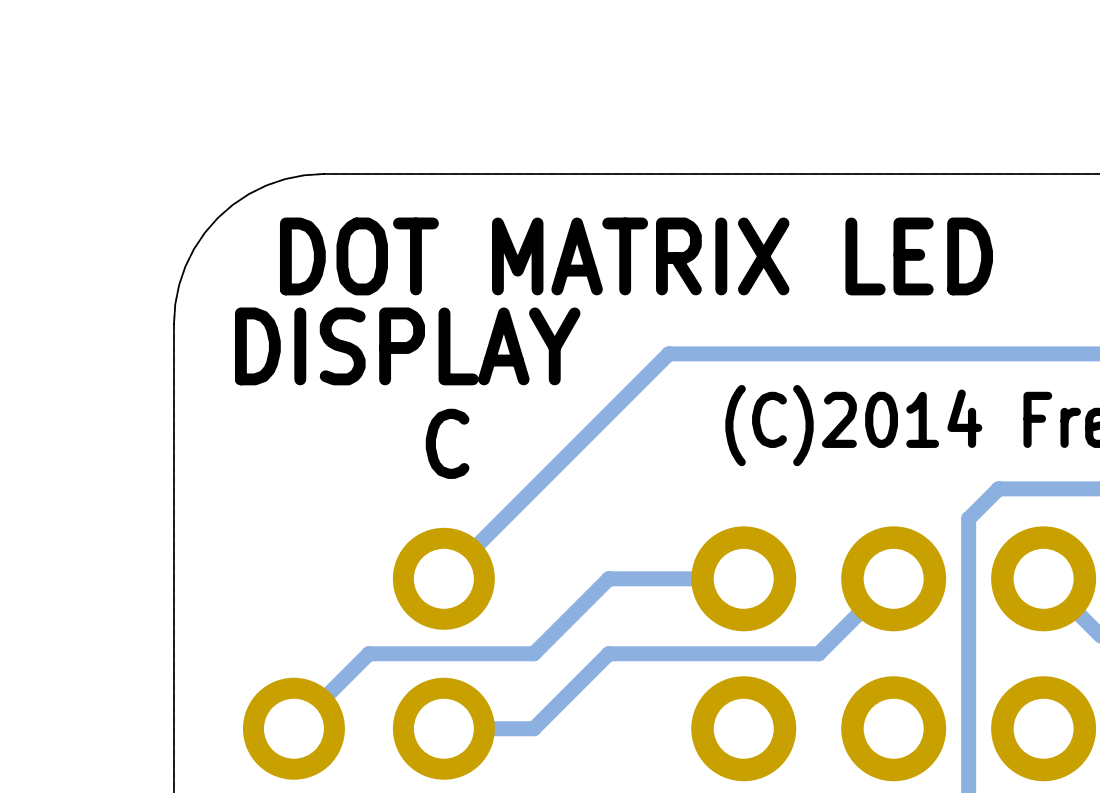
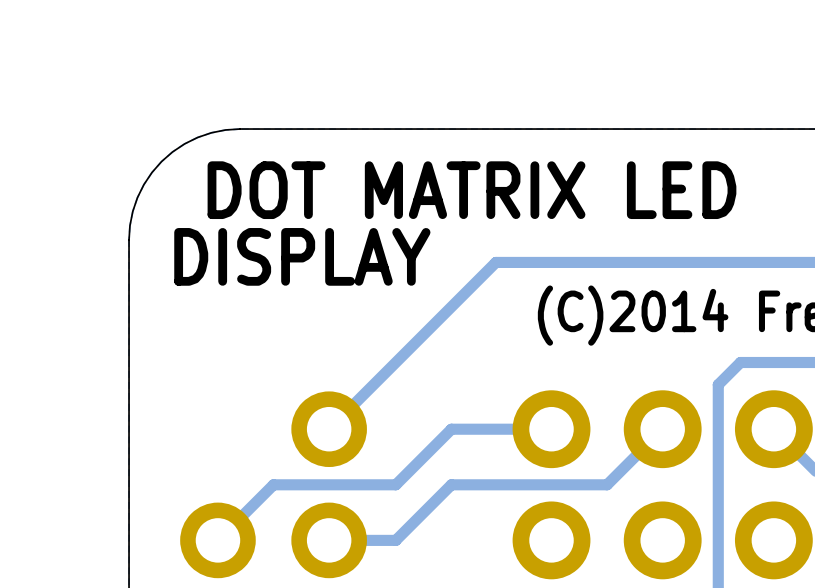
text: C (447, 443) -> none

